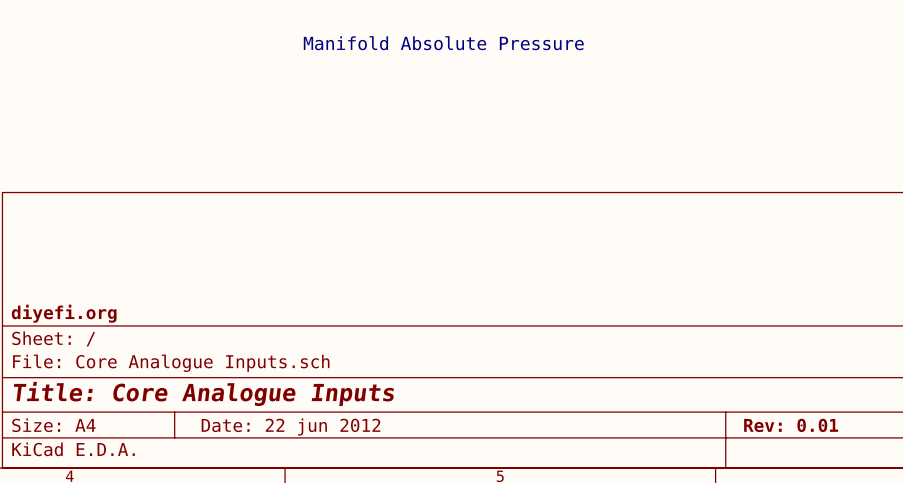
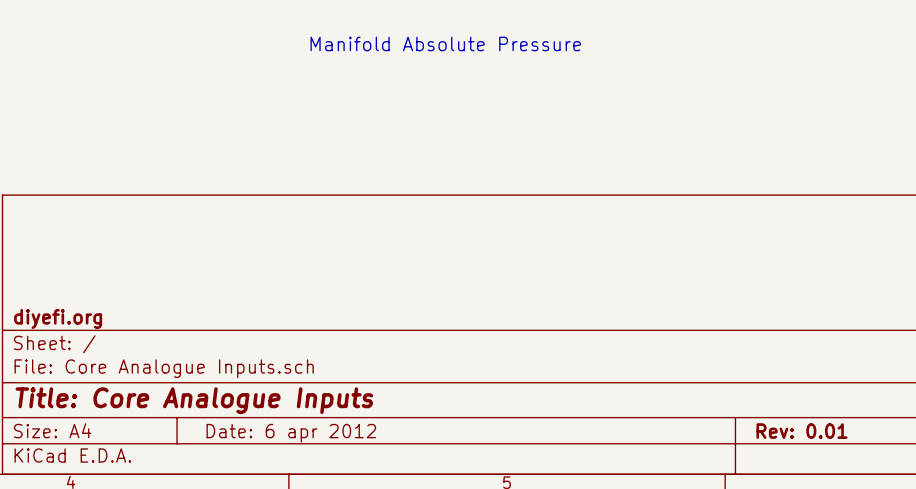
title block: Date: 22 jun 2012 (291, 426) -> Date: 6 apr 2012 (291, 433)

